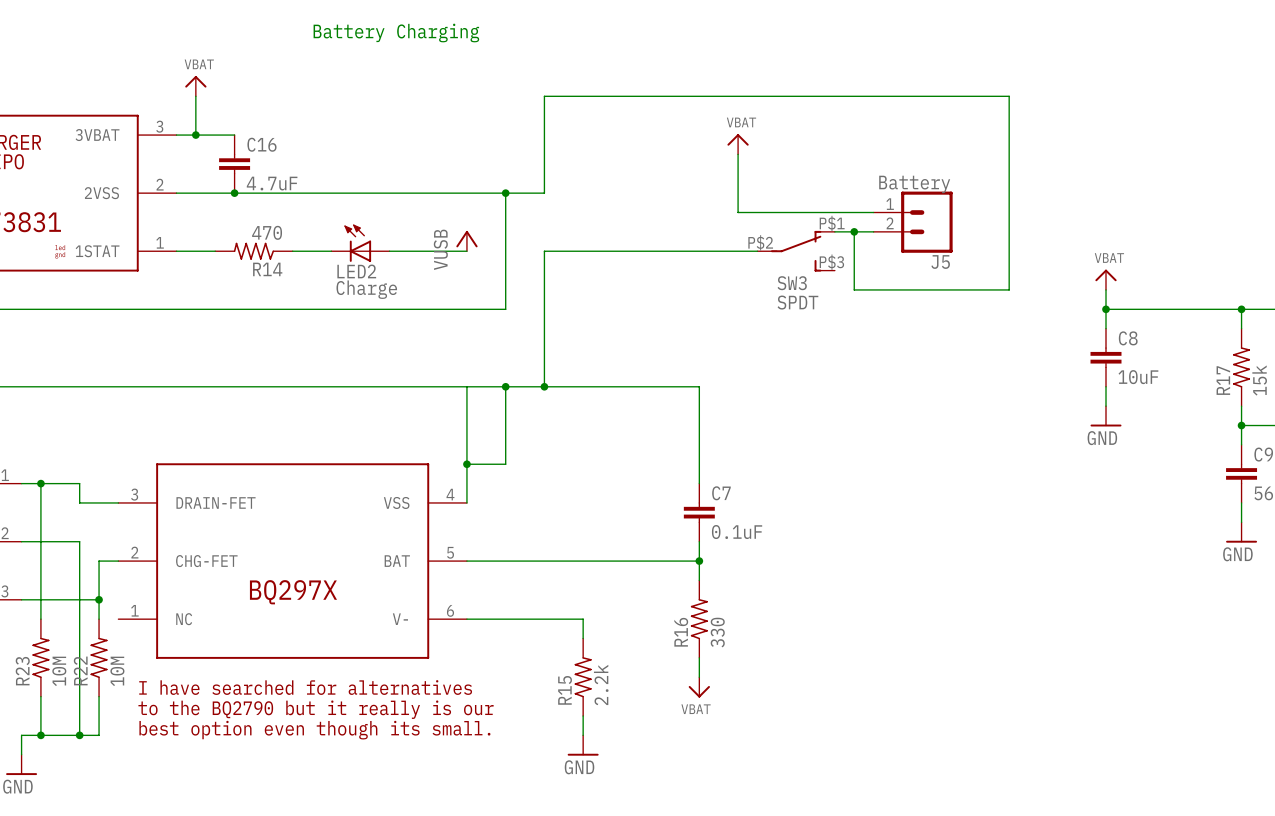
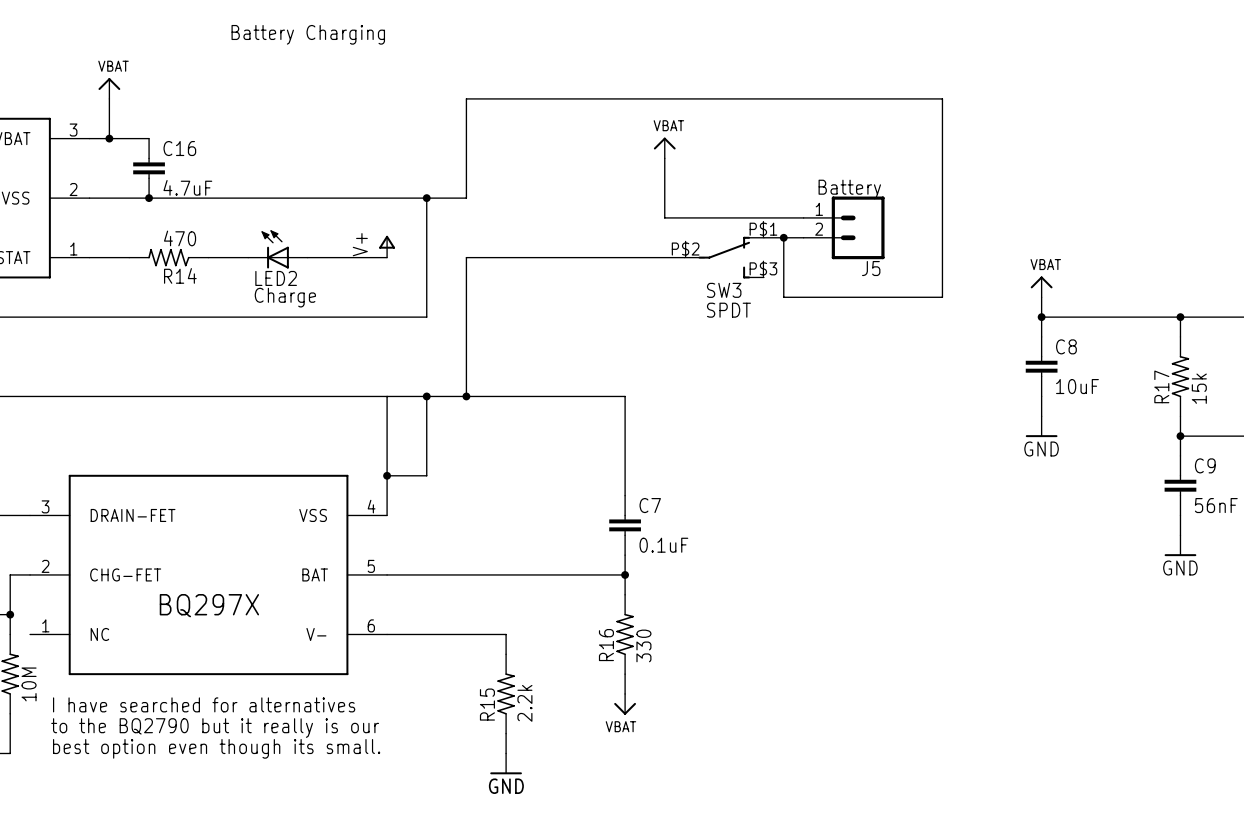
power symbol: VUSB (466, 241) -> V+ (387, 246)

